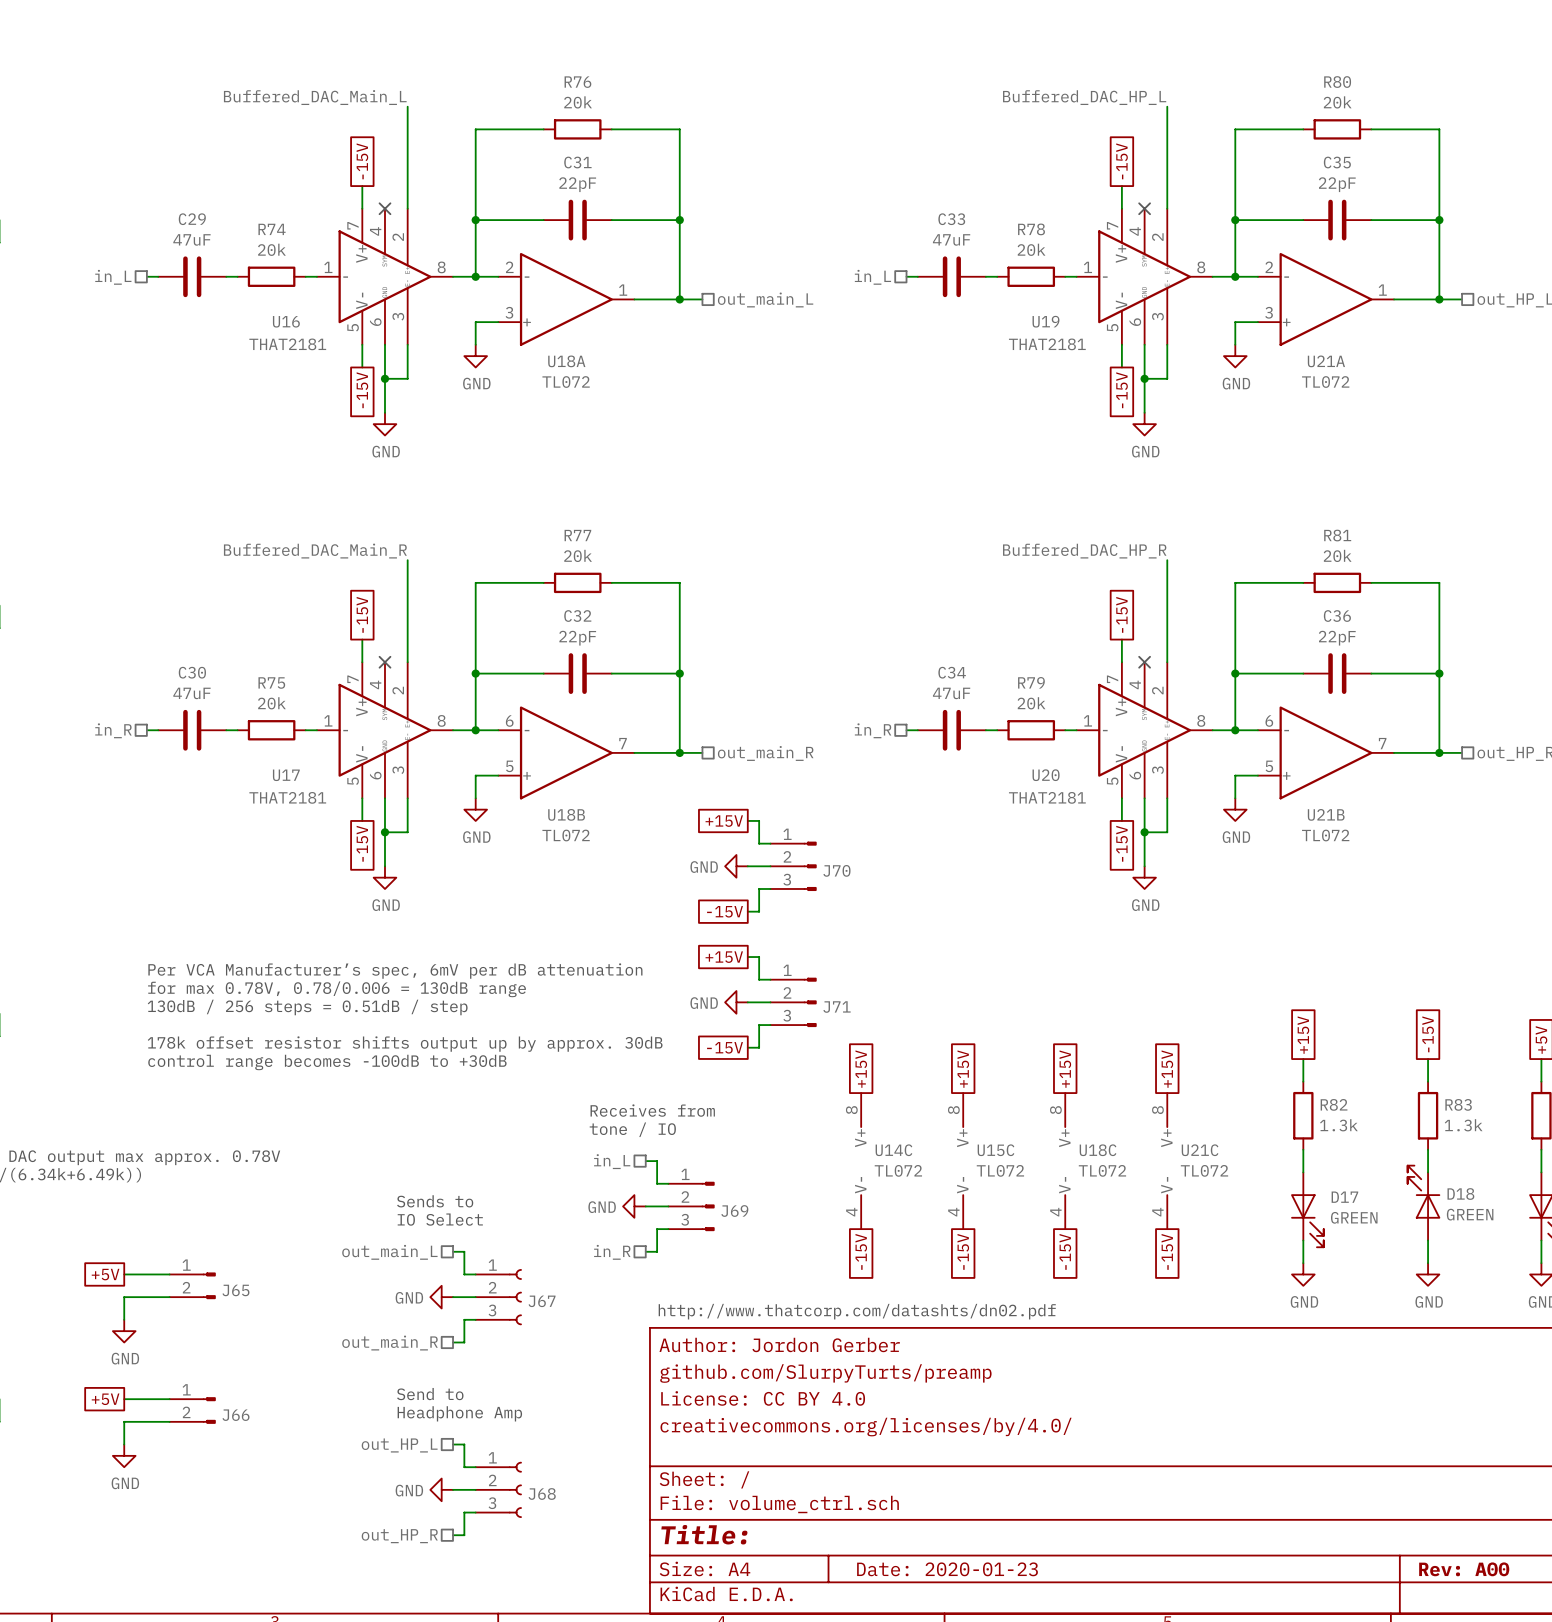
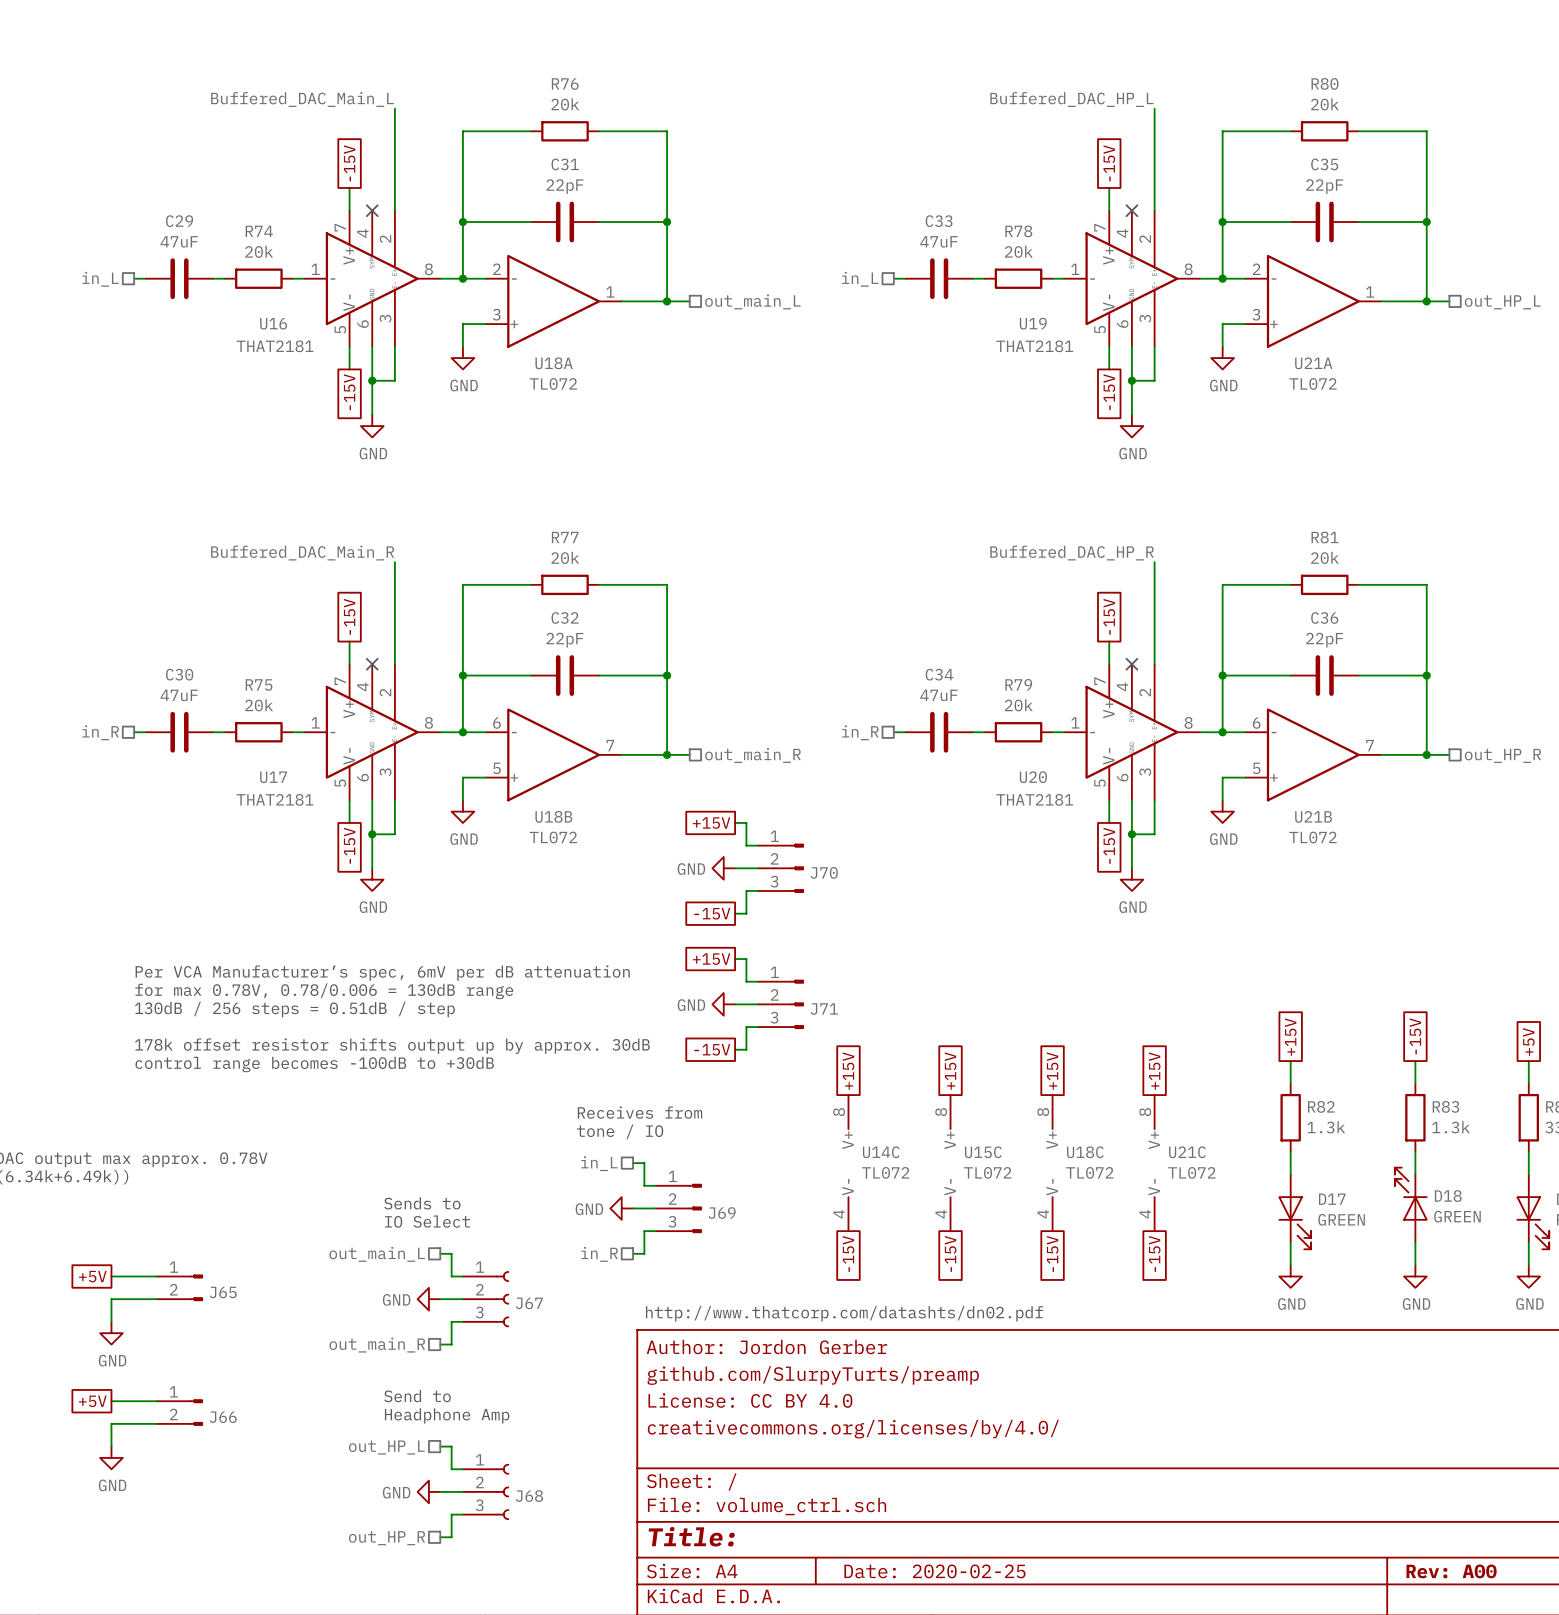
title block: Date: 2020-01-23 (947, 1569) -> Date: 2020-02-25 (934, 1571)

